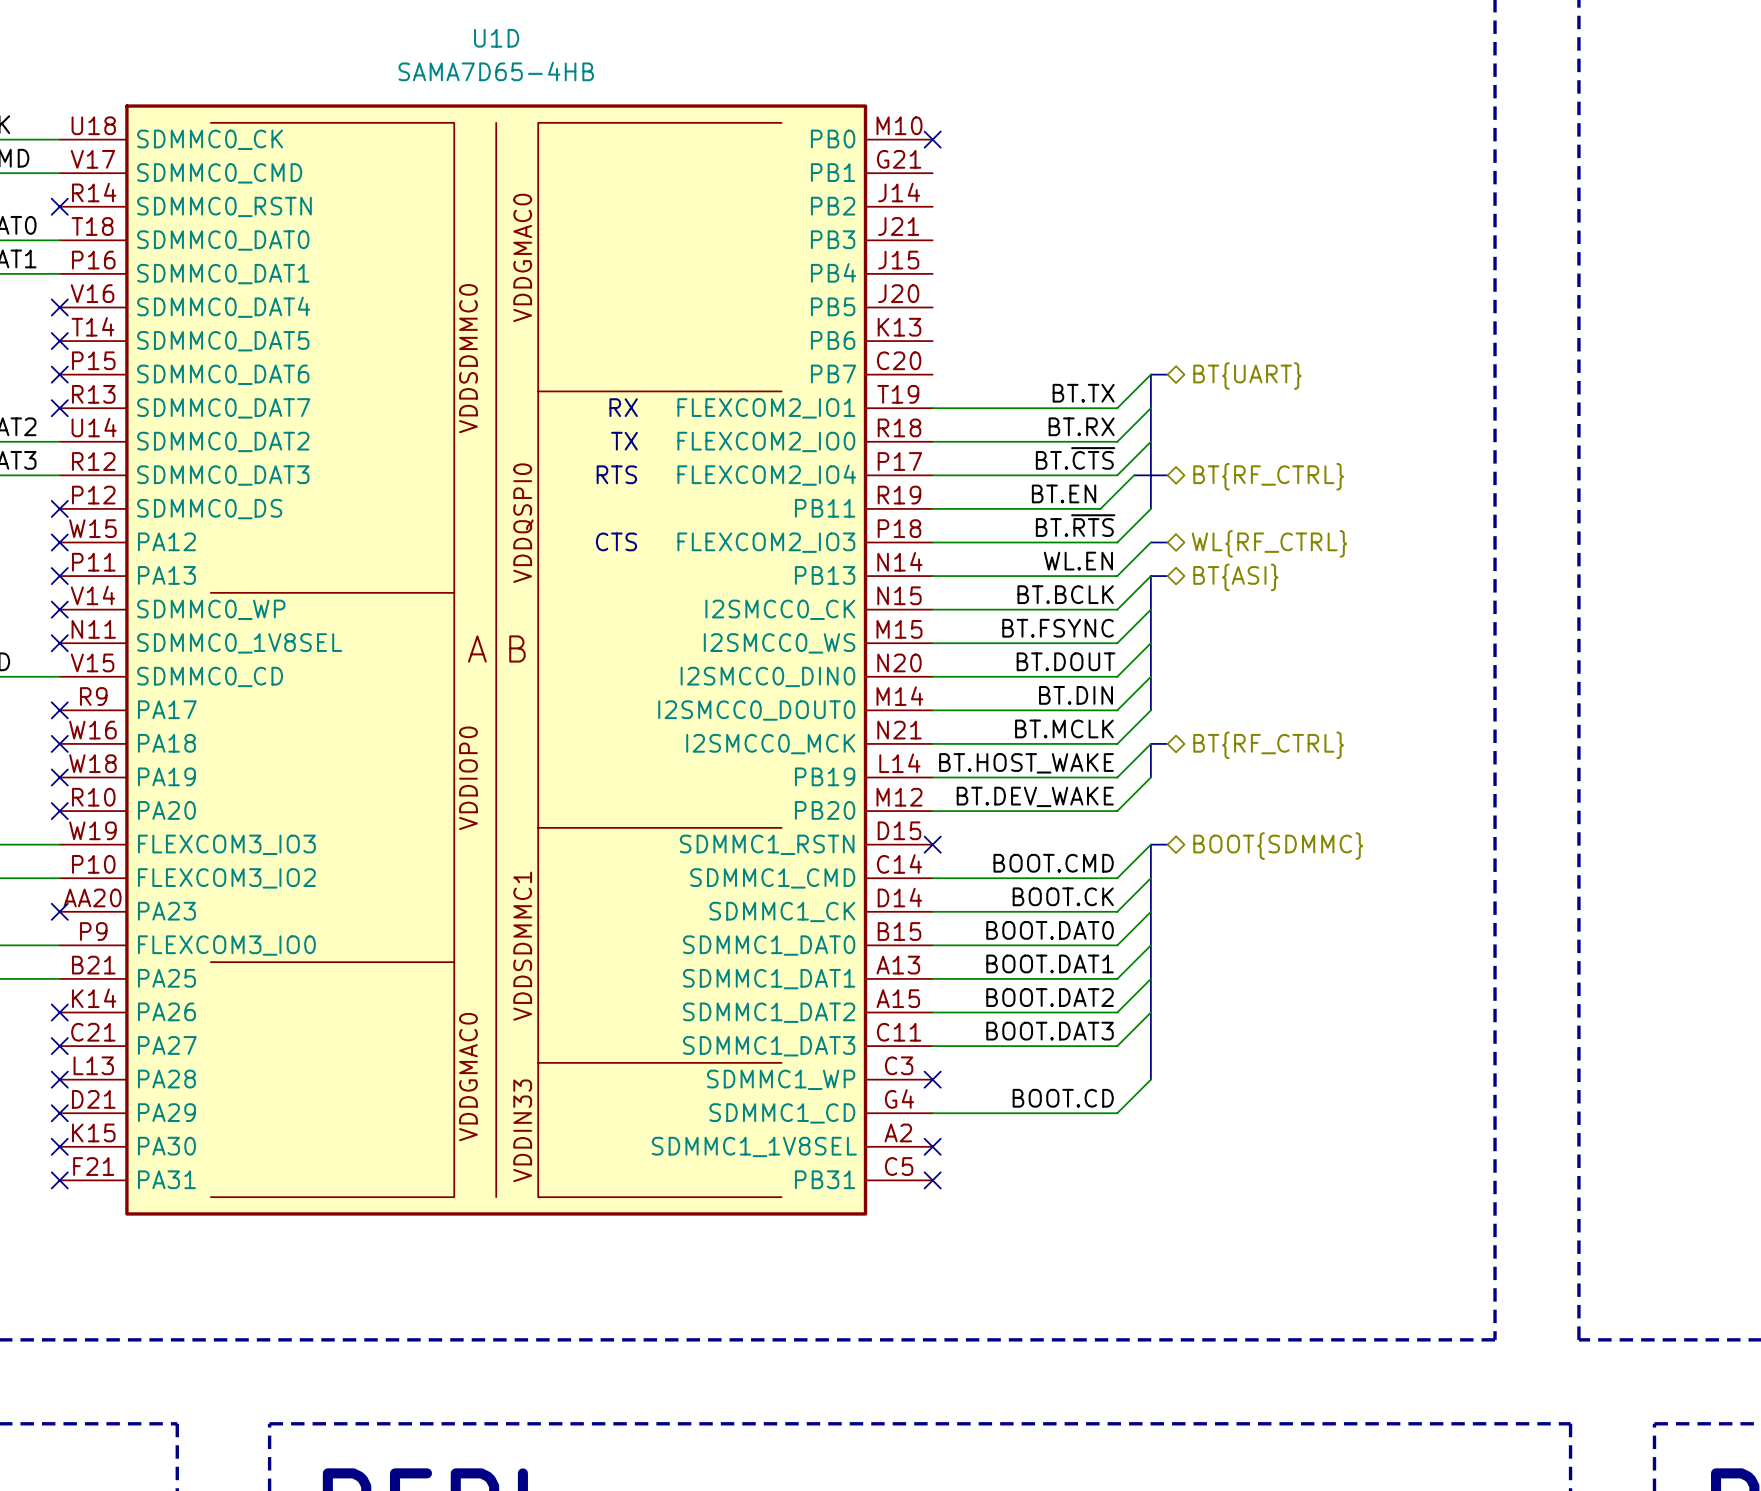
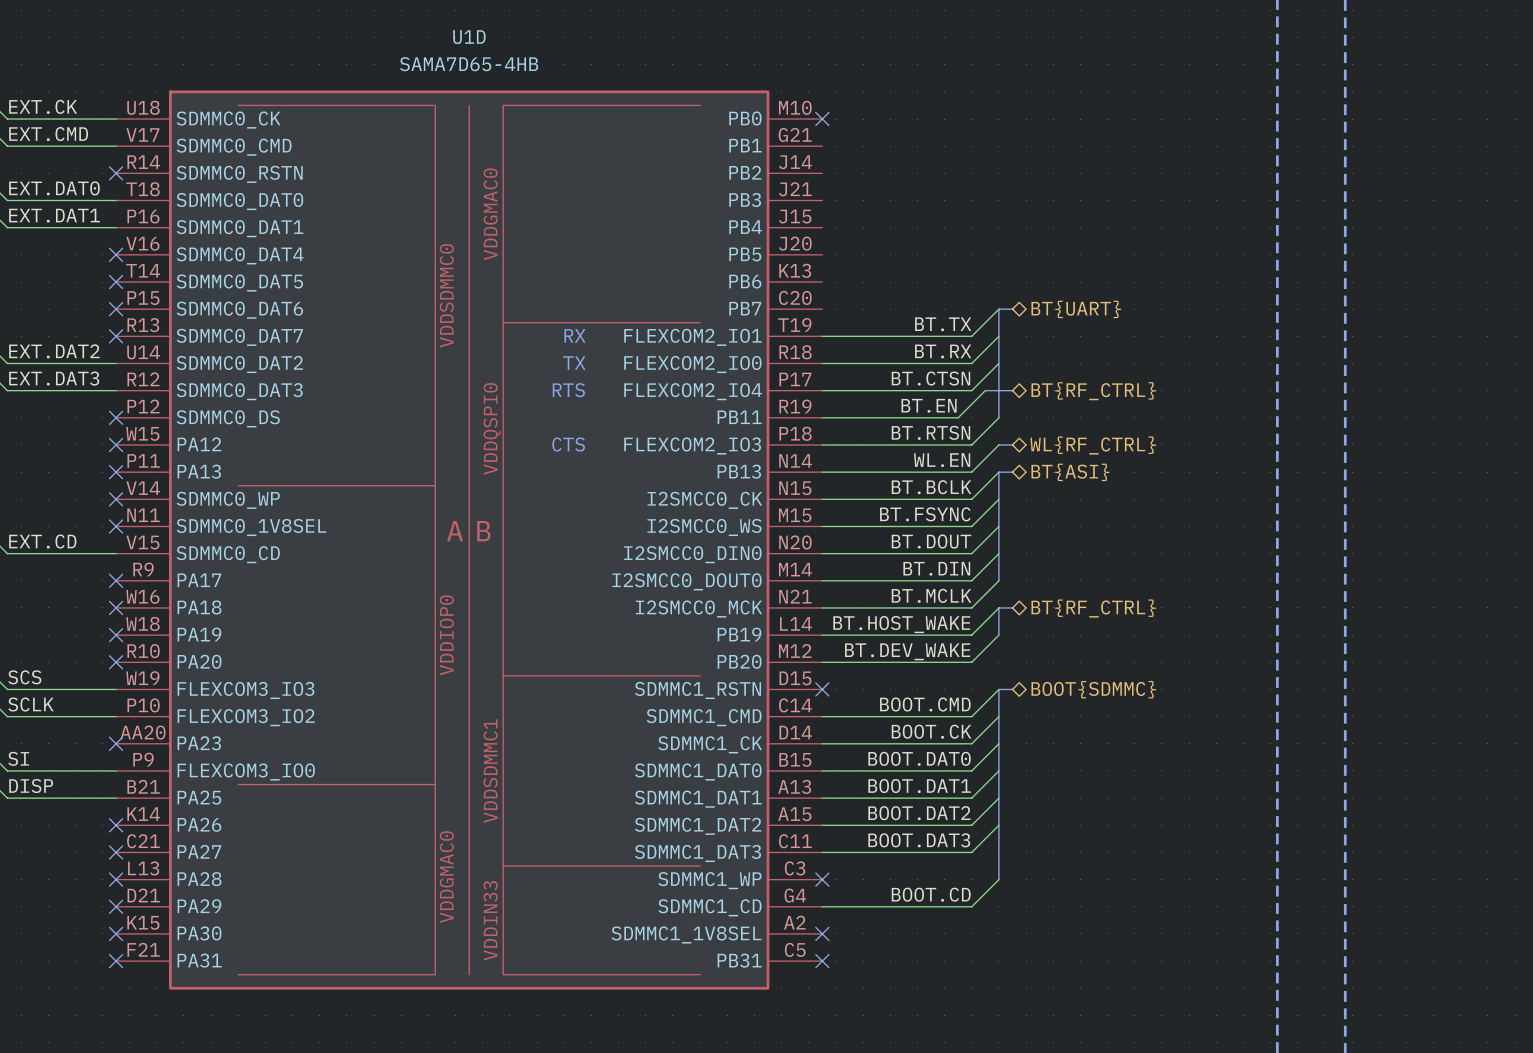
label: BT.~{CTS} (1075, 458) -> BT.CTSN (930, 378)
label: BT.~{RTS} (1075, 525) -> BT.RTSN (930, 432)

